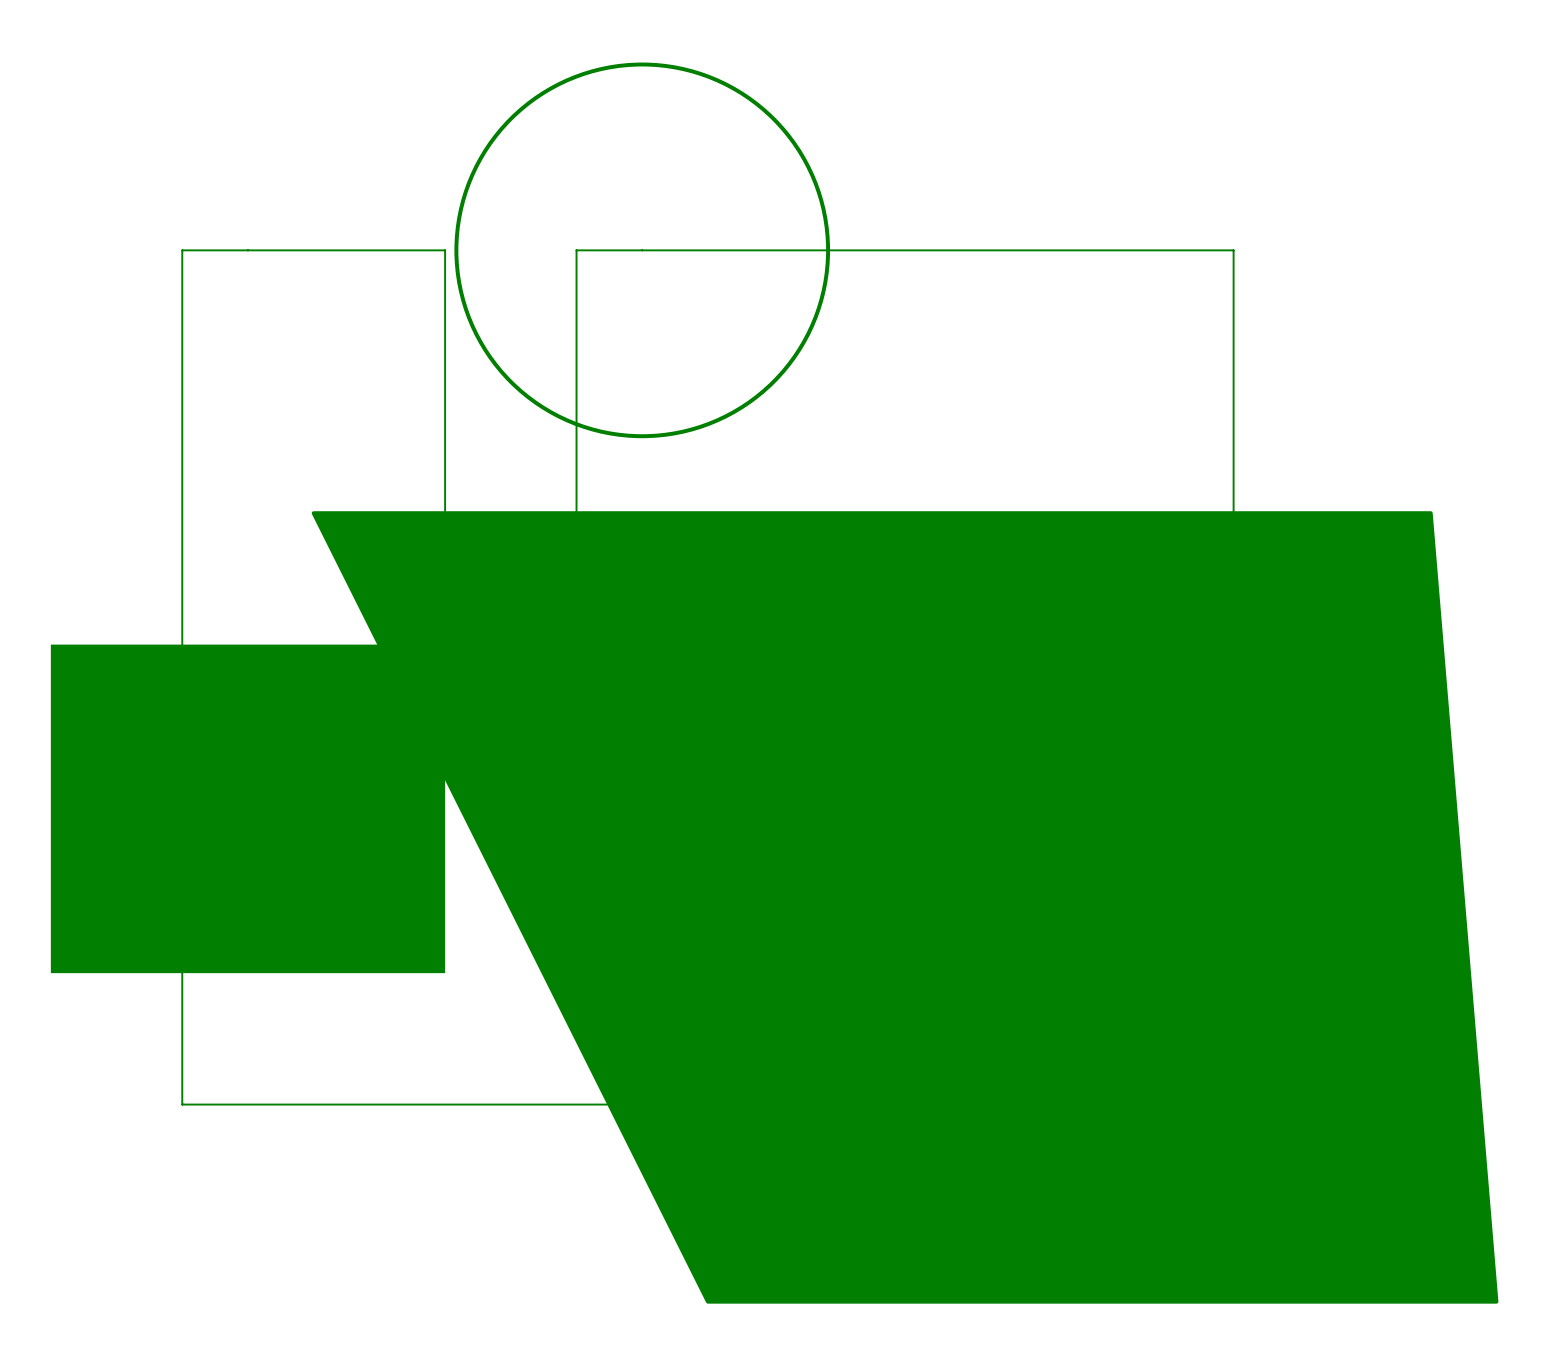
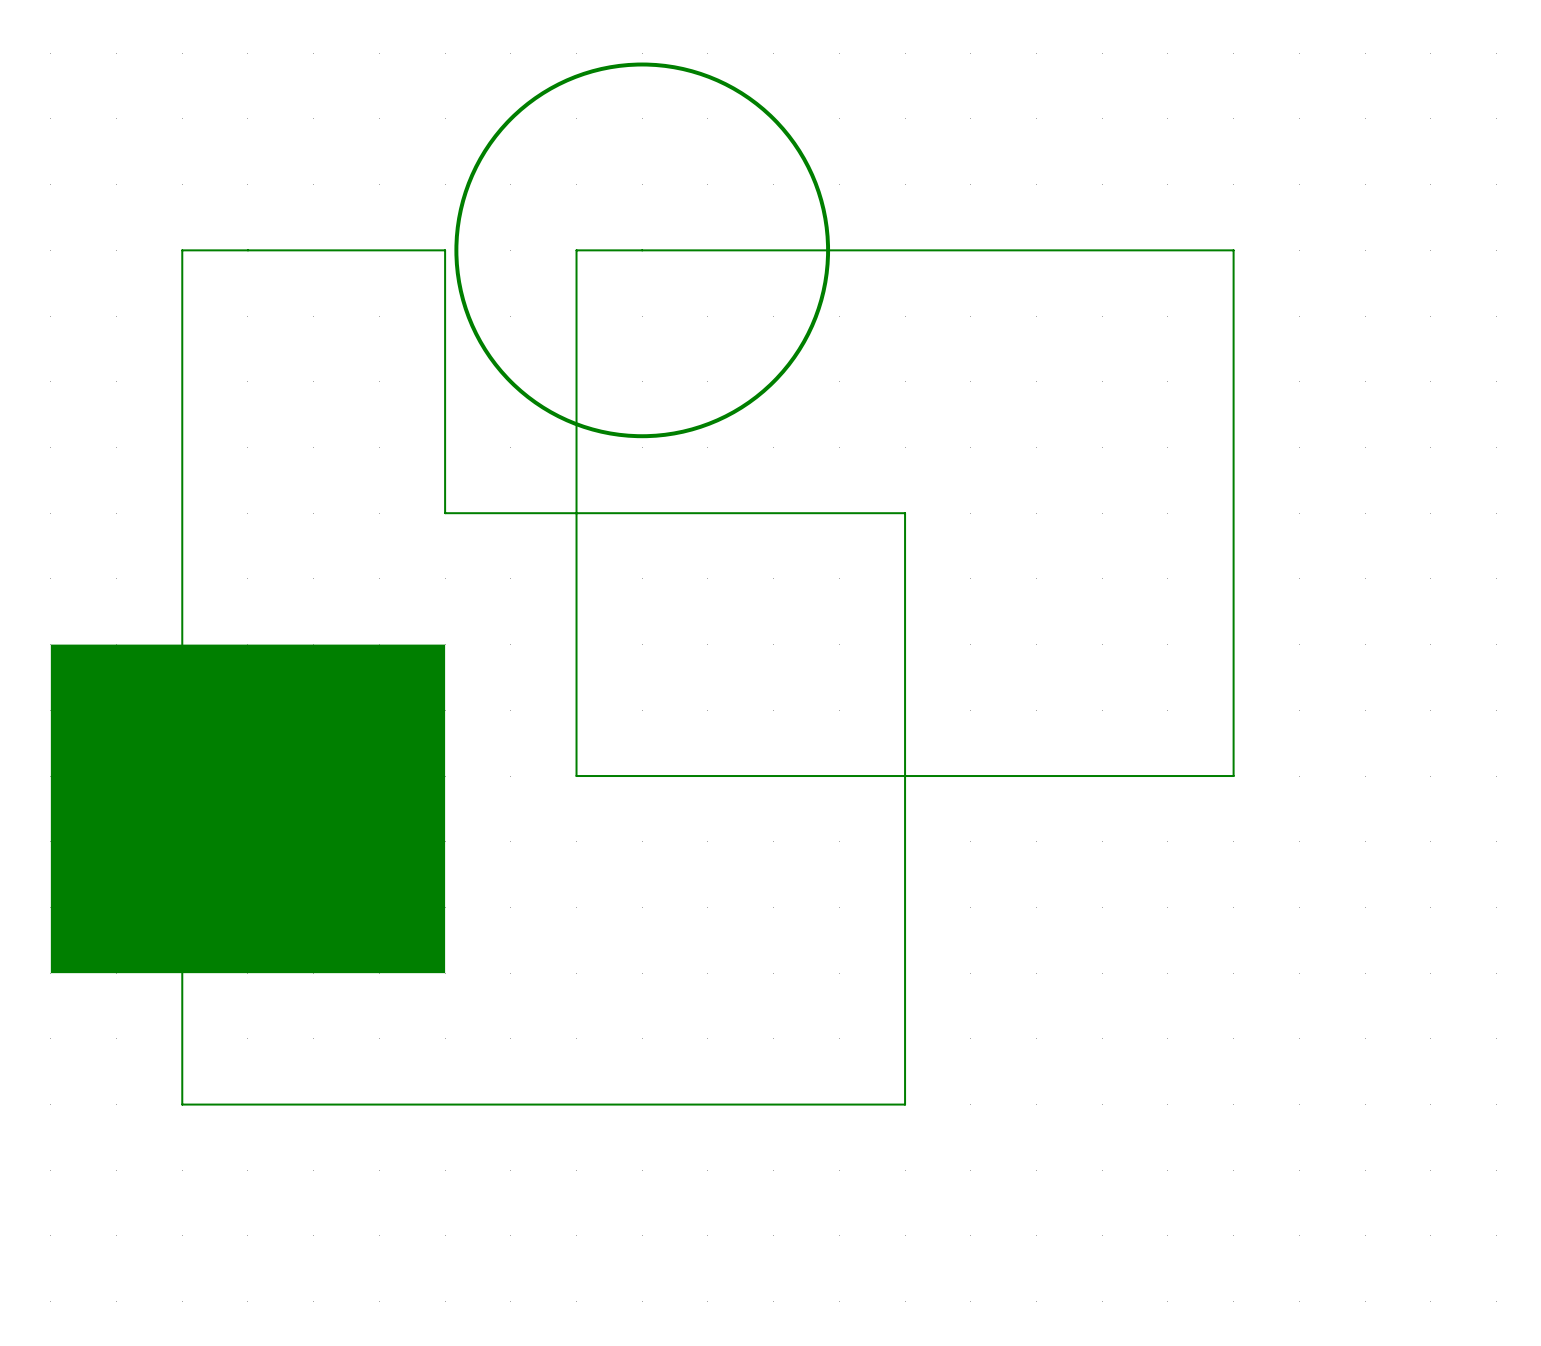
drawing: [311, 511, 1499, 1304] -> none

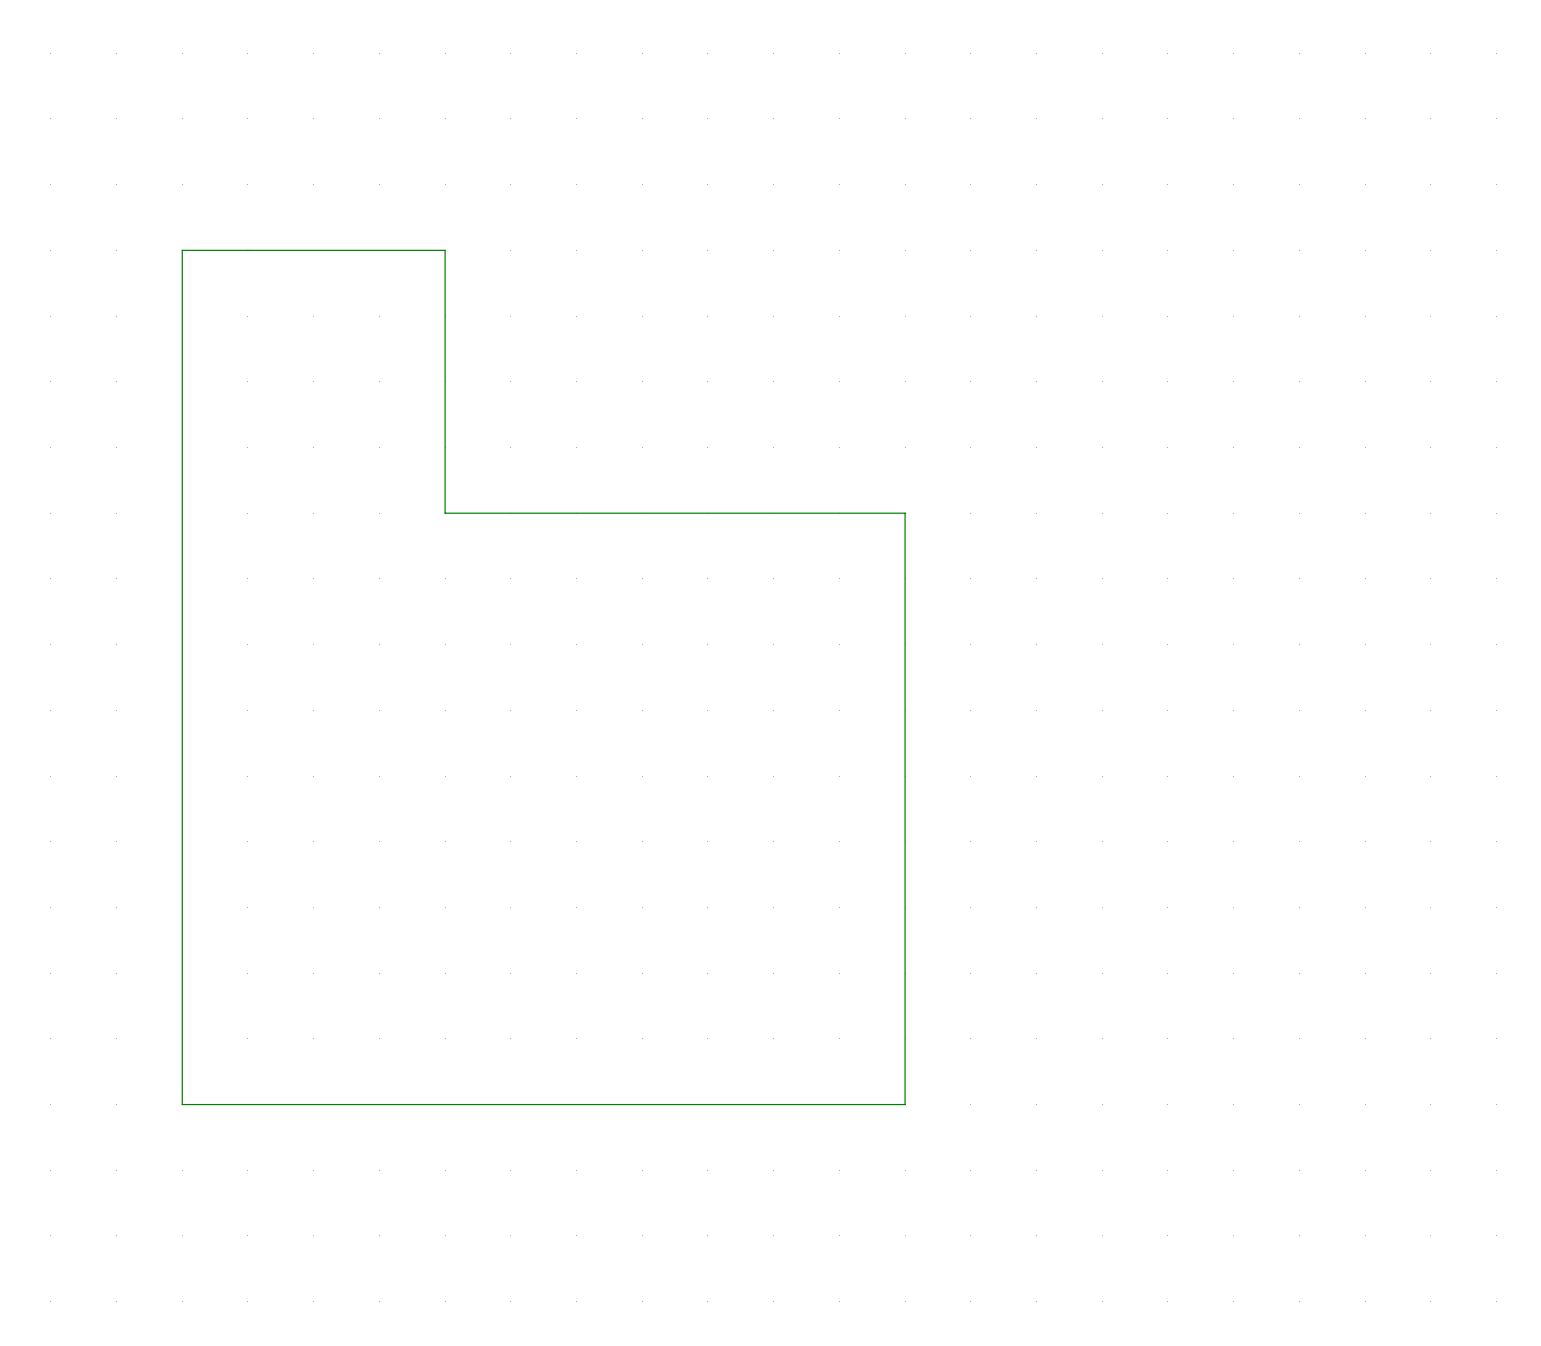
drawing: [454, 62, 831, 439] -> none
wire: (576, 250) (1233, 250) (1233, 776) (576, 776) (576, 250) -> none
drawing: [50, 644, 446, 974] -> none

